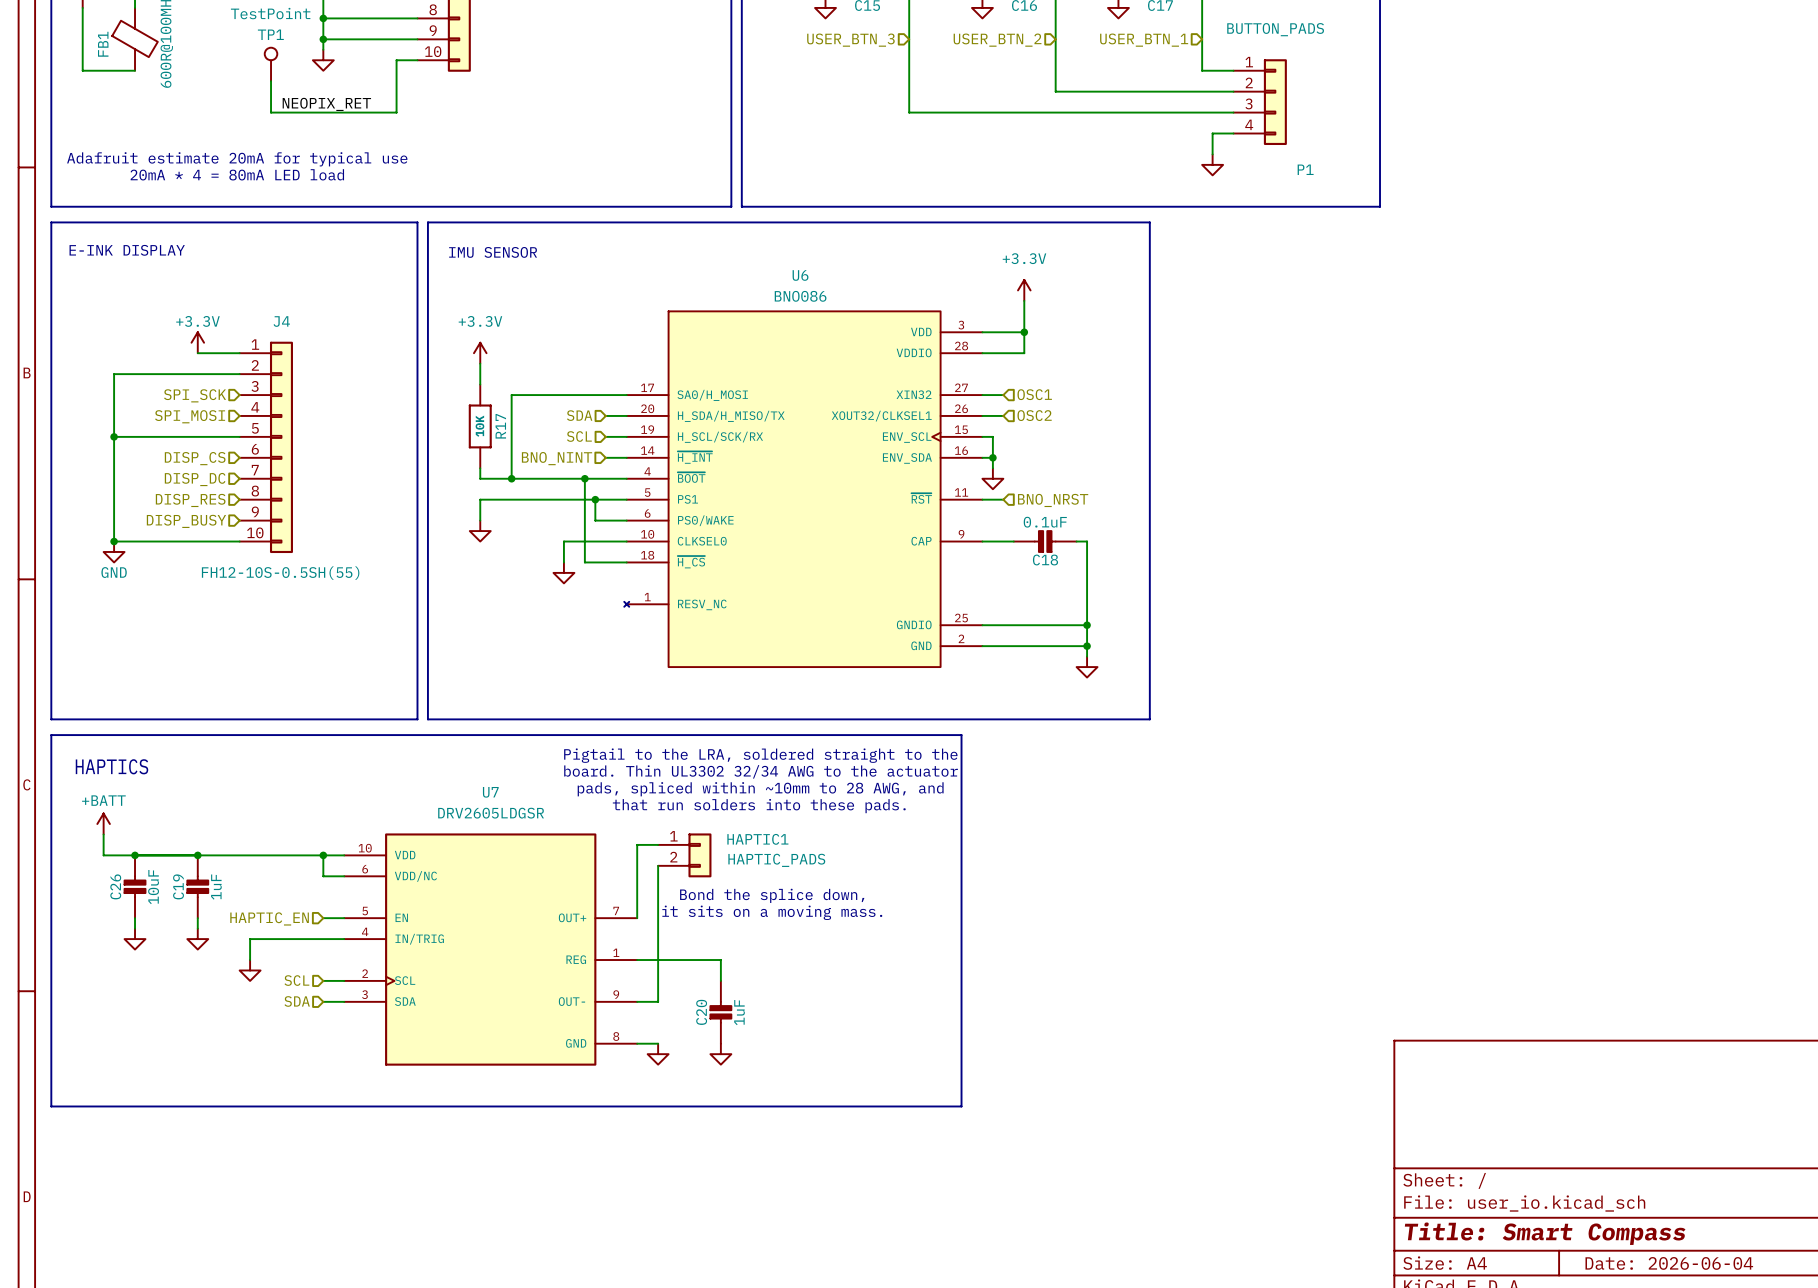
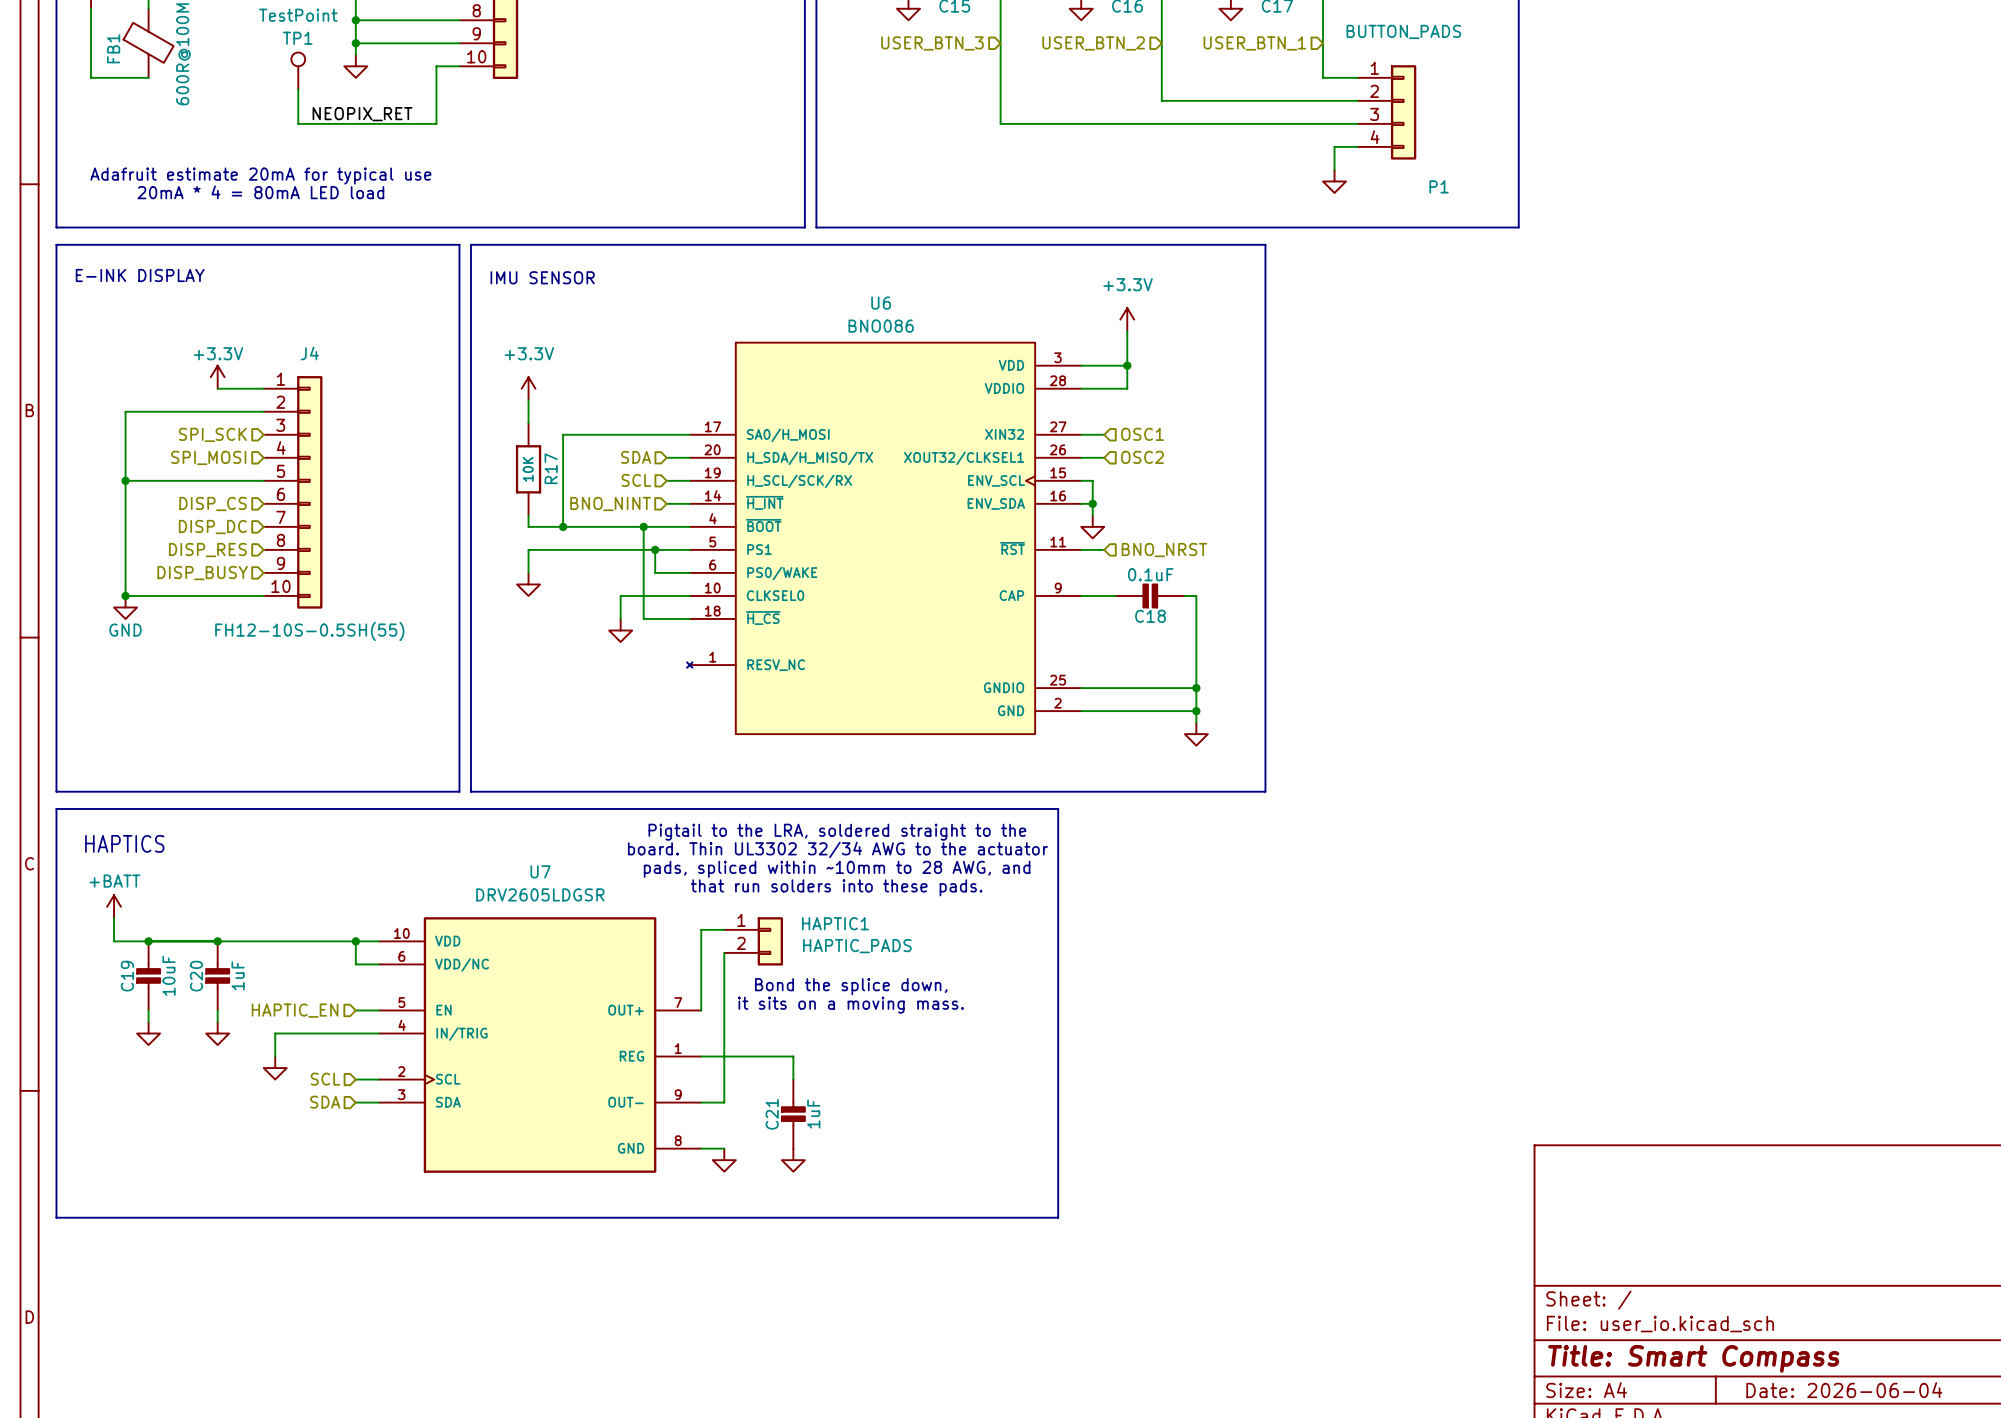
C26 name: C26 (115, 886) -> C19 (127, 976)
C19 name: C19 (178, 886) -> C20 (196, 976)
C20 name: C20 (701, 1012) -> C21 (772, 1114)

